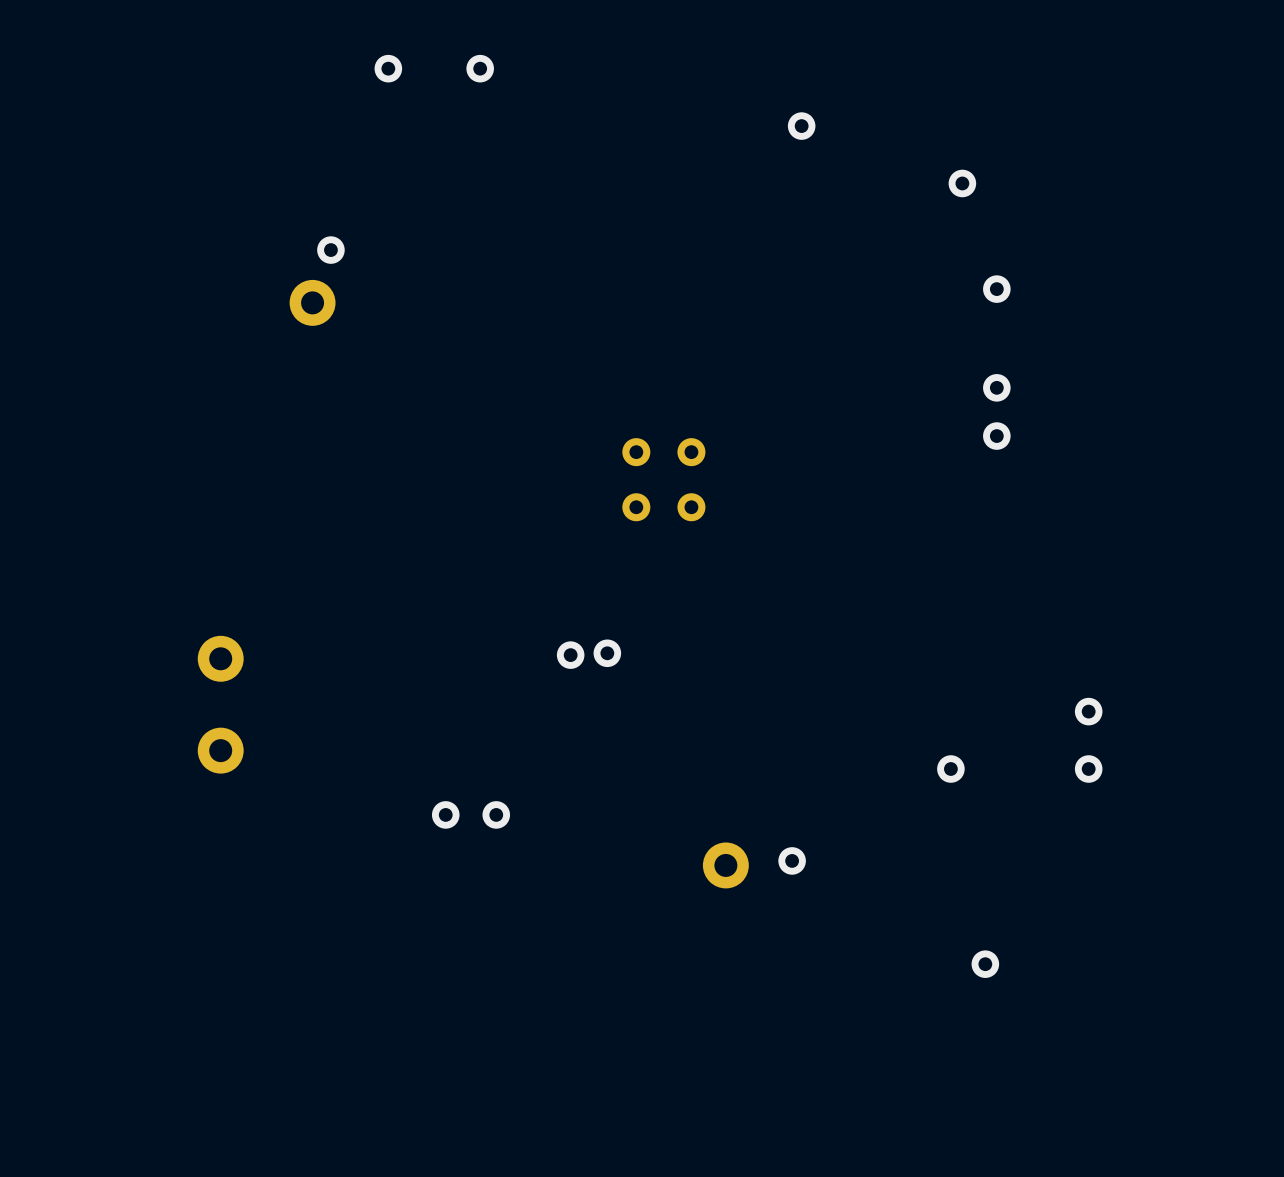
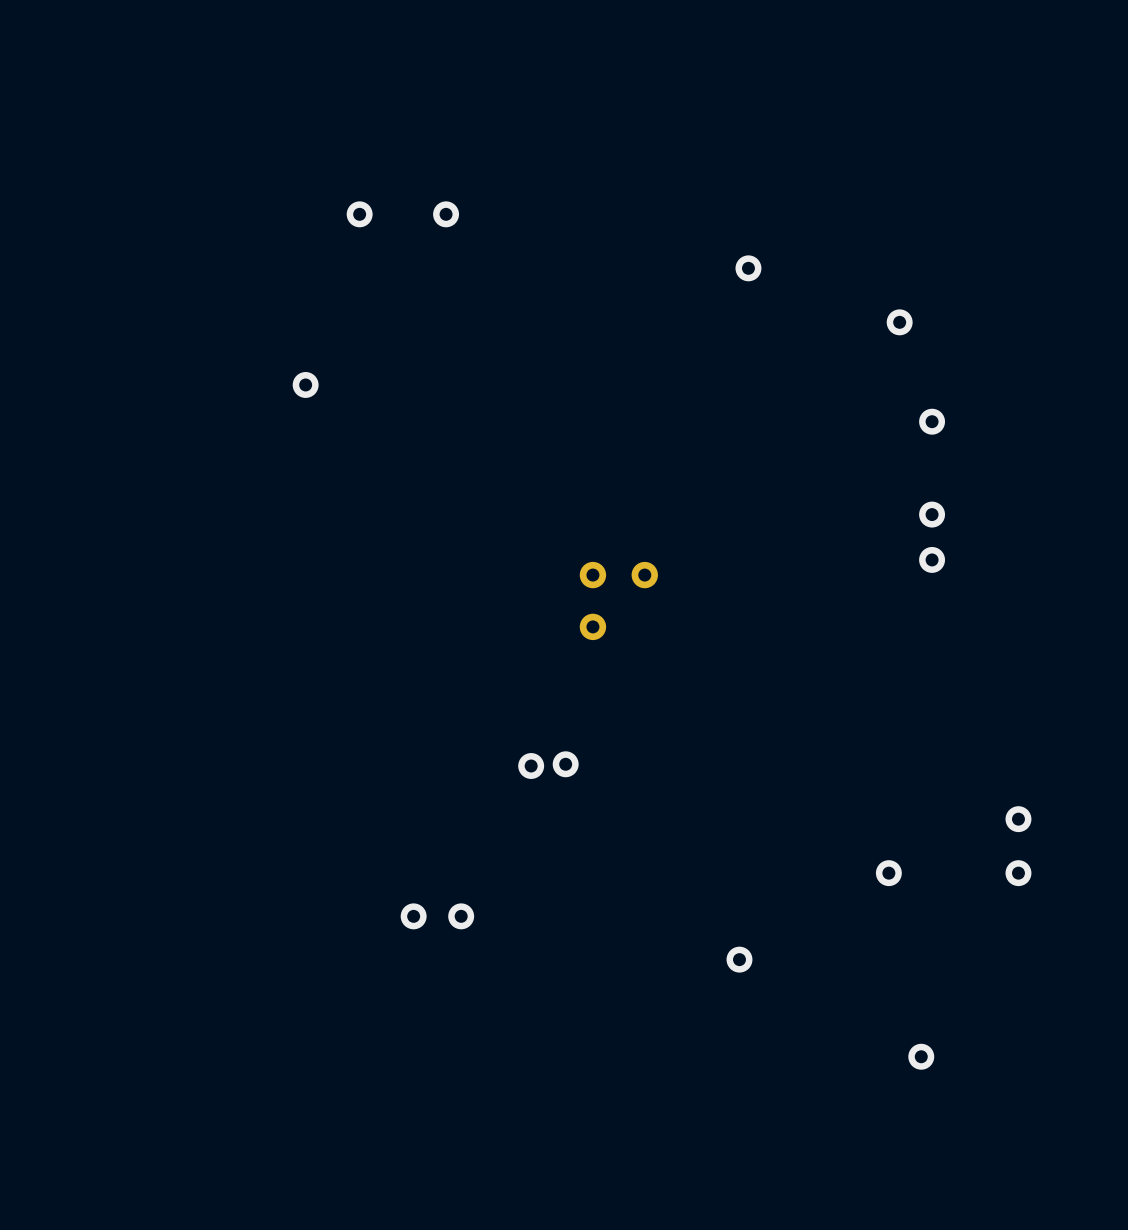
part: (312, 302) -> none
part footprint: [622, 438, 706, 522] -> [579, 561, 658, 641]
part: (220, 658) -> none
part: (220, 750) -> none
part: (725, 865) -> none

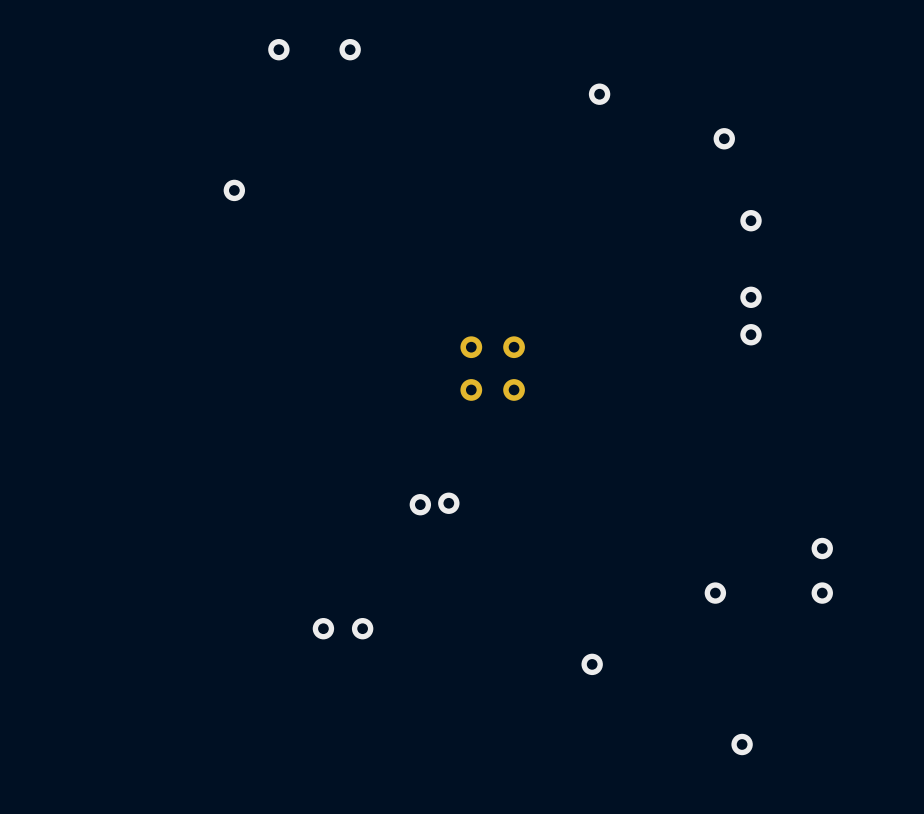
part footprint: [579, 561, 658, 641] -> [460, 336, 525, 401]

